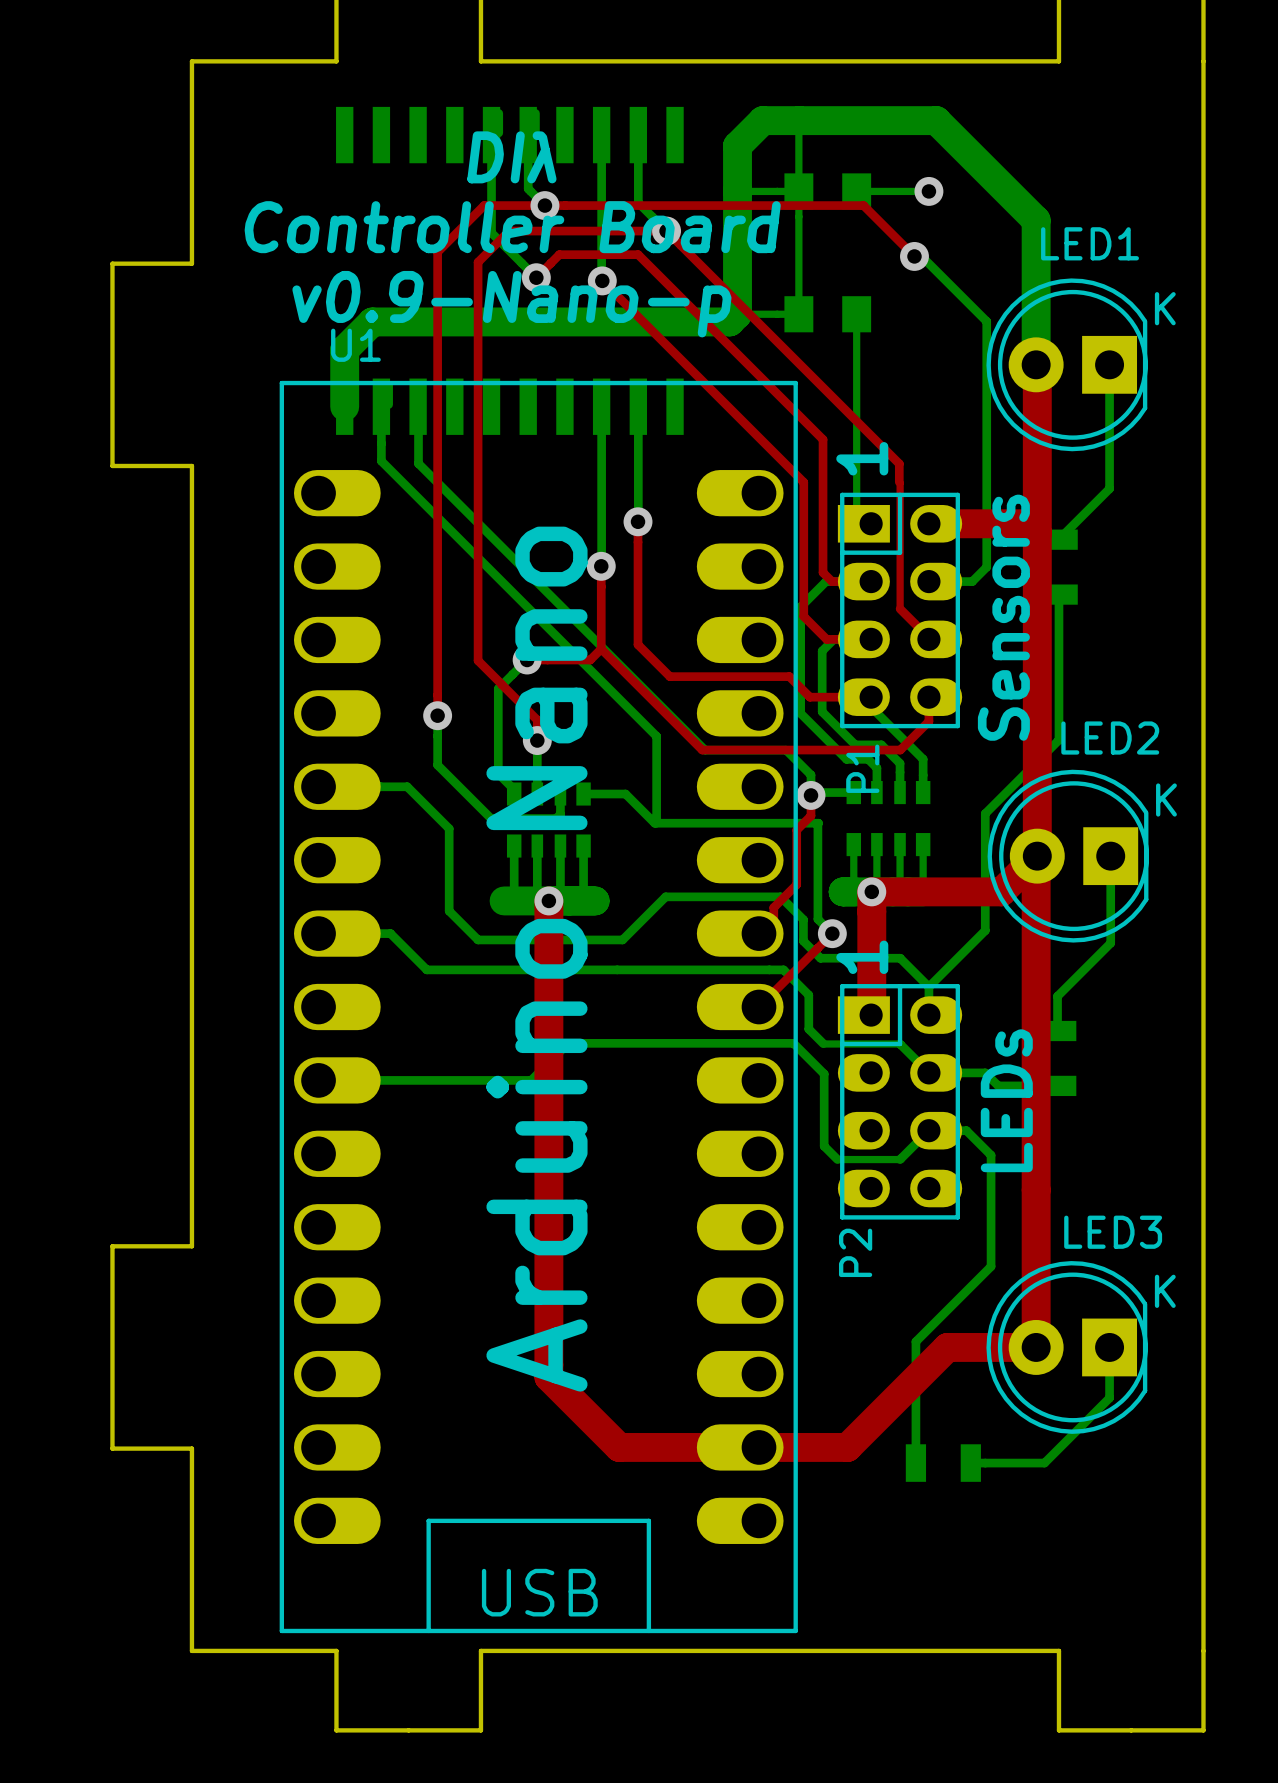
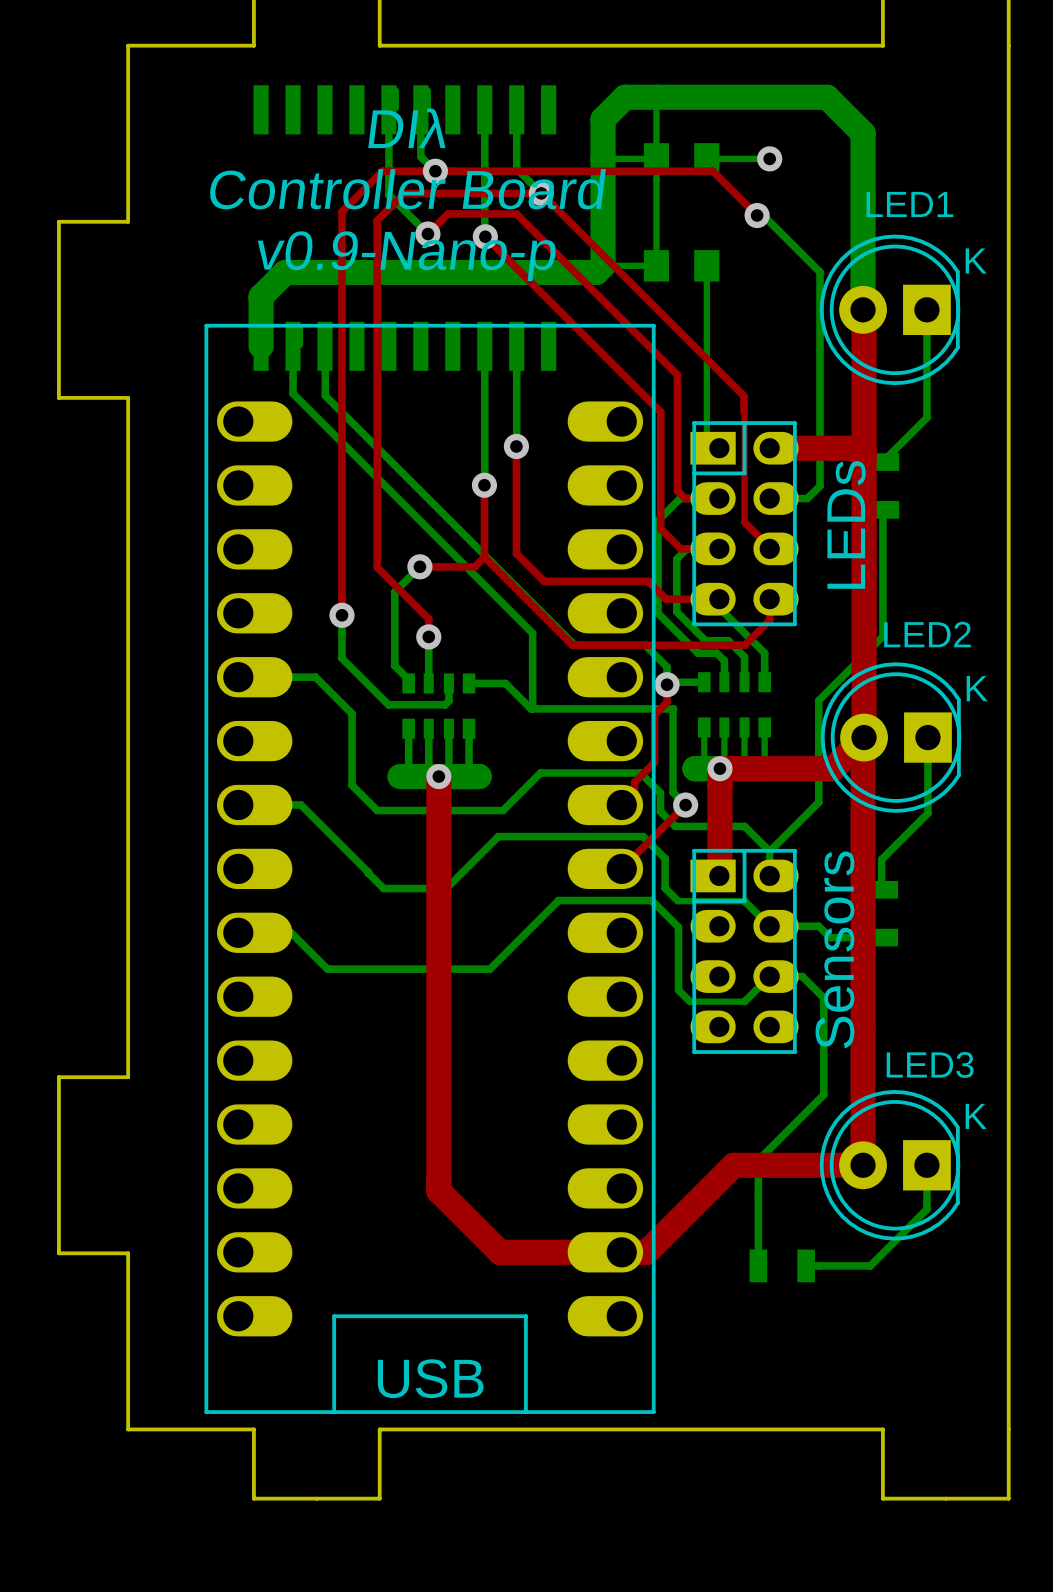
bottom track: (936, 120) (1036, 220) -> (776, 97) (827, 97) (863, 133) (863, 184)
U1 name: U1 (355, 345) -> none
text: 1 (862, 458) -> none
text: Sensors (1003, 617) -> LEDs (846, 524)
P1 name: P1 (862, 768) -> none
text: 1 (862, 957) -> none
U1 text: Arduino Nano (536, 959) -> none
bottom track: (426, 969) (617, 969) -> (332, 836) (383, 888) (446, 888) (498, 836)
bottom track: (686, 1043) (568, 1043) (531, 1080) (379, 1080) -> (558, 900) (490, 969) (327, 969) (291, 932)
text: LEDs (1006, 1100) -> Sensors (834, 949)
P2 name: P2 (855, 1252) -> none
top track: (947, 1347) (847, 1447) (787, 1447) -> (785, 1165) (733, 1165) (646, 1252)

